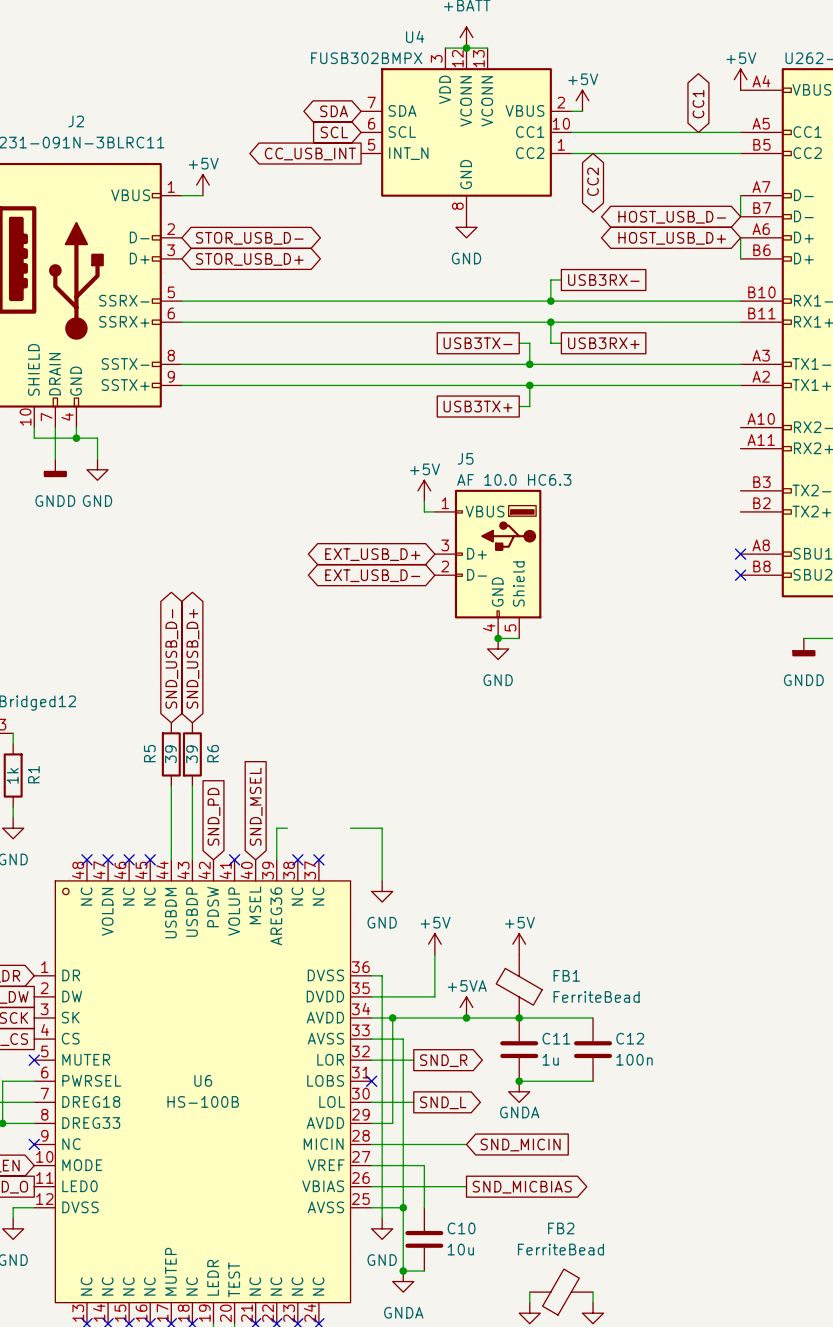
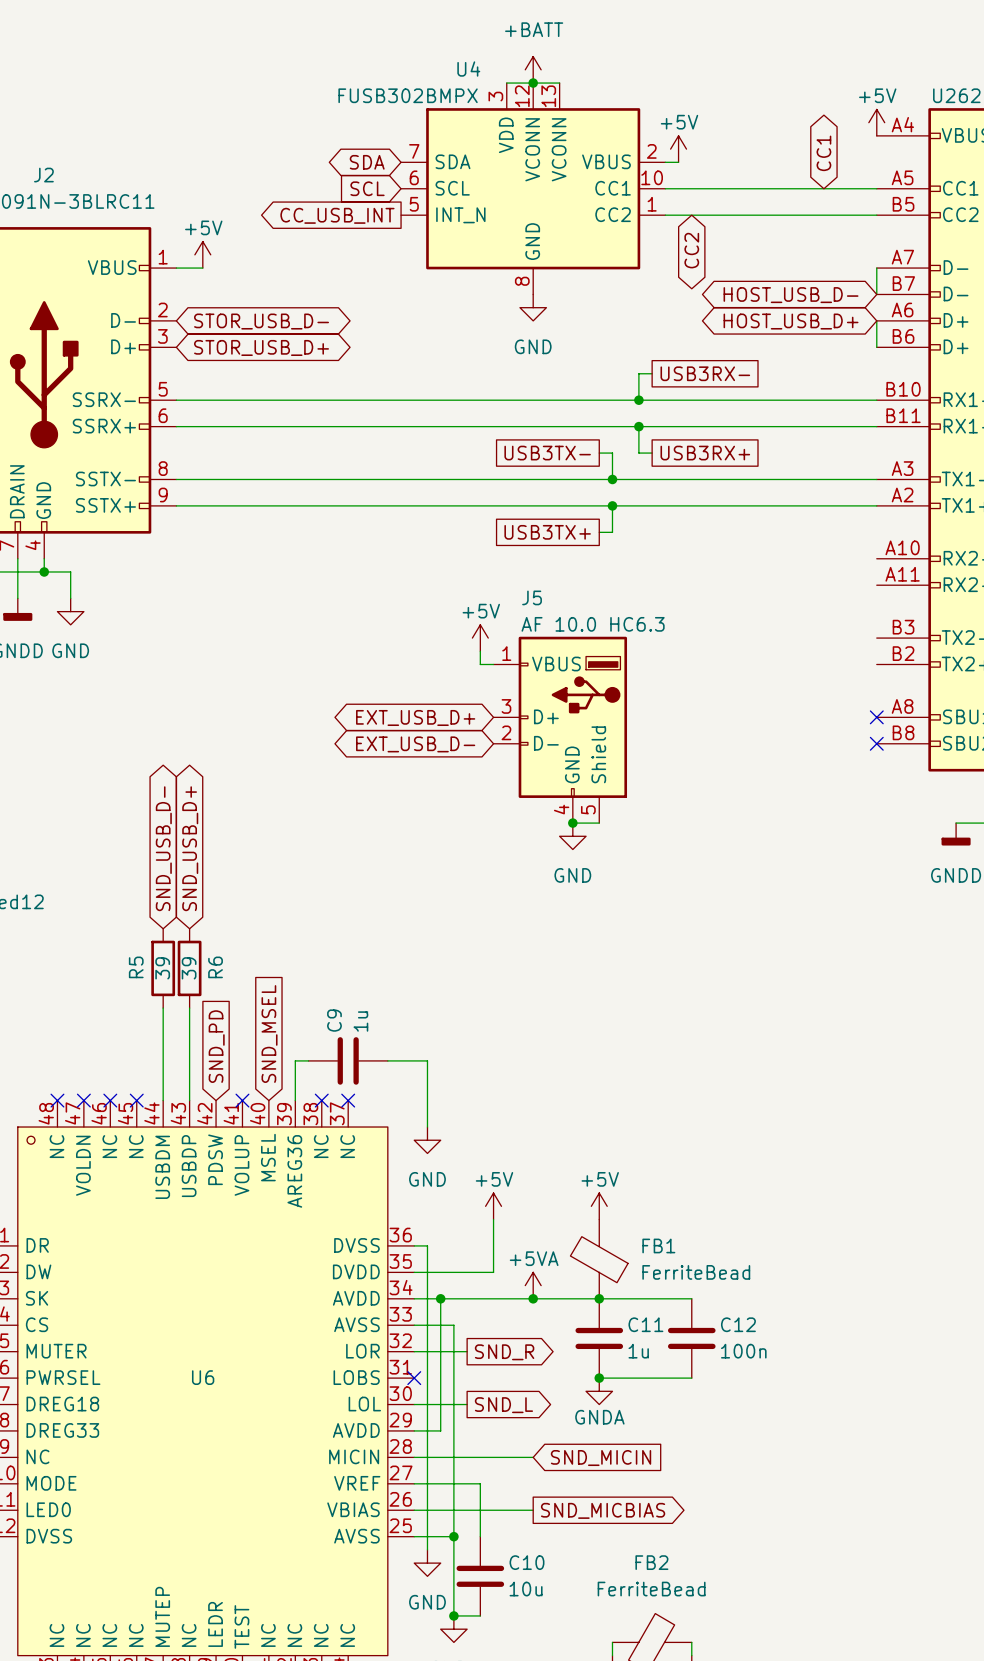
C9: none -> 1u (348, 1060)
U6 value: HS-100B (203, 1101) -> none

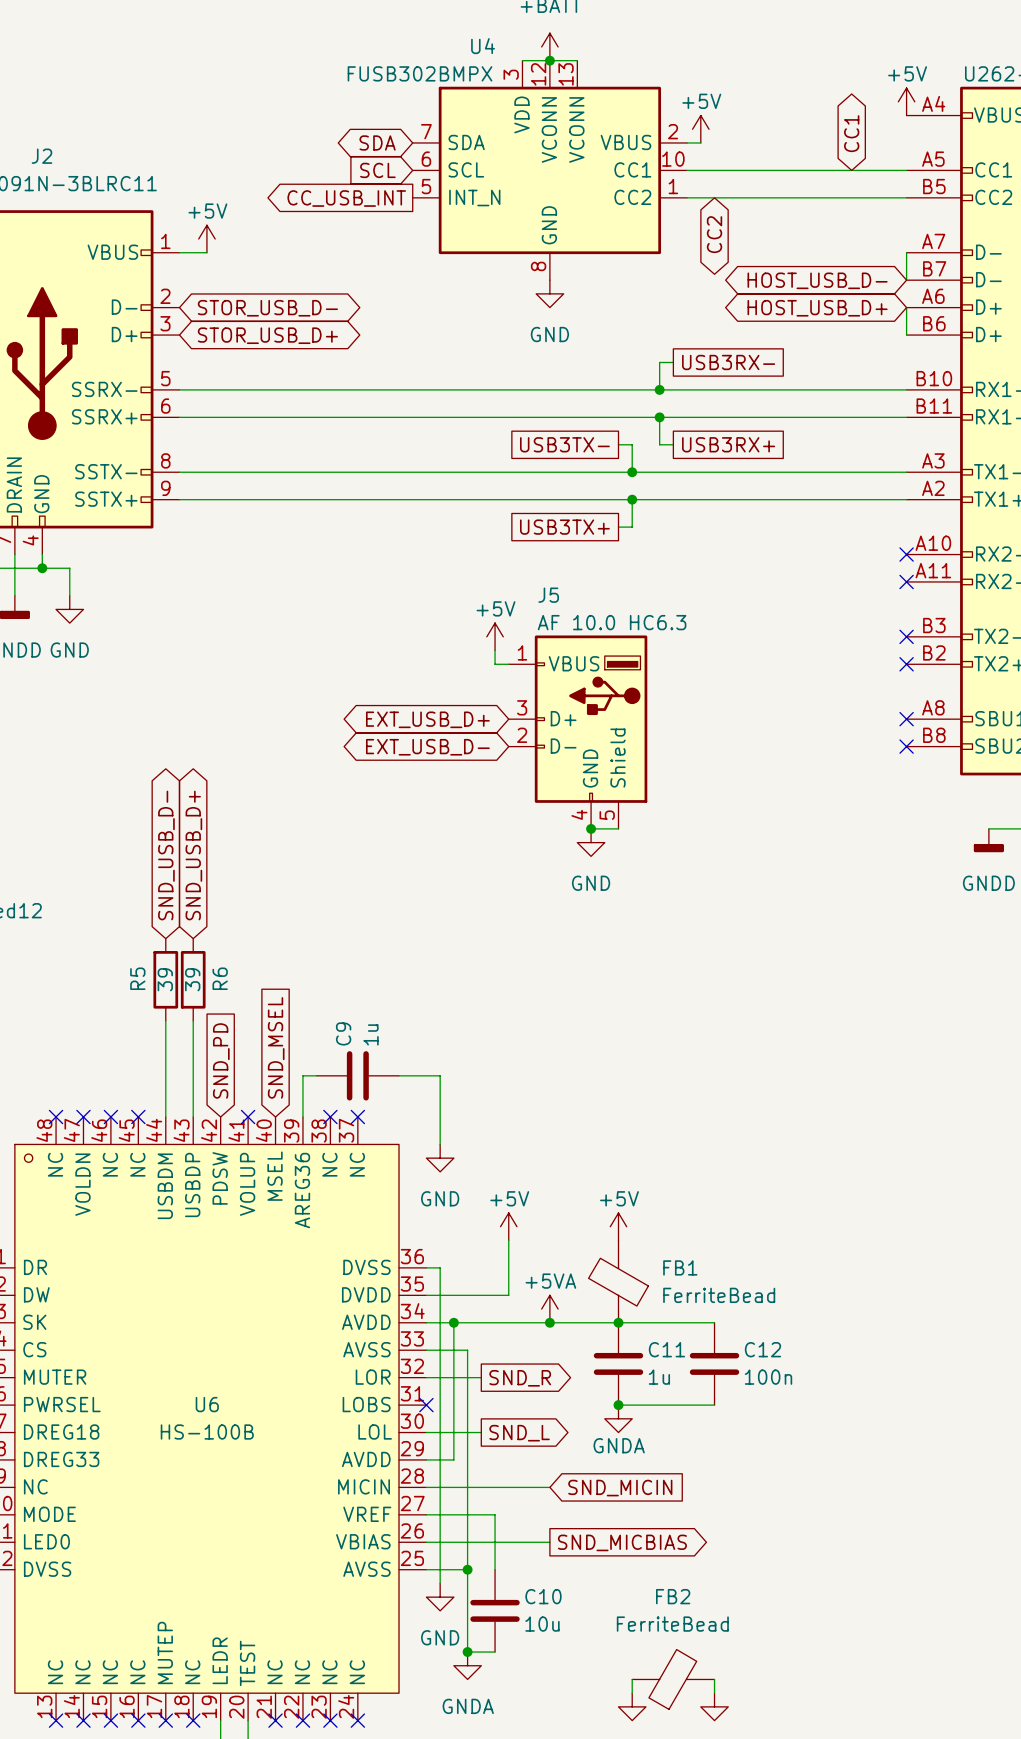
no-connect mark: none -> (906, 554)
no-connect mark: none -> (906, 581)
no-connect mark: none -> (906, 636)
no-connect mark: none -> (906, 664)
U6 value: none -> HS-100B (207, 1432)

